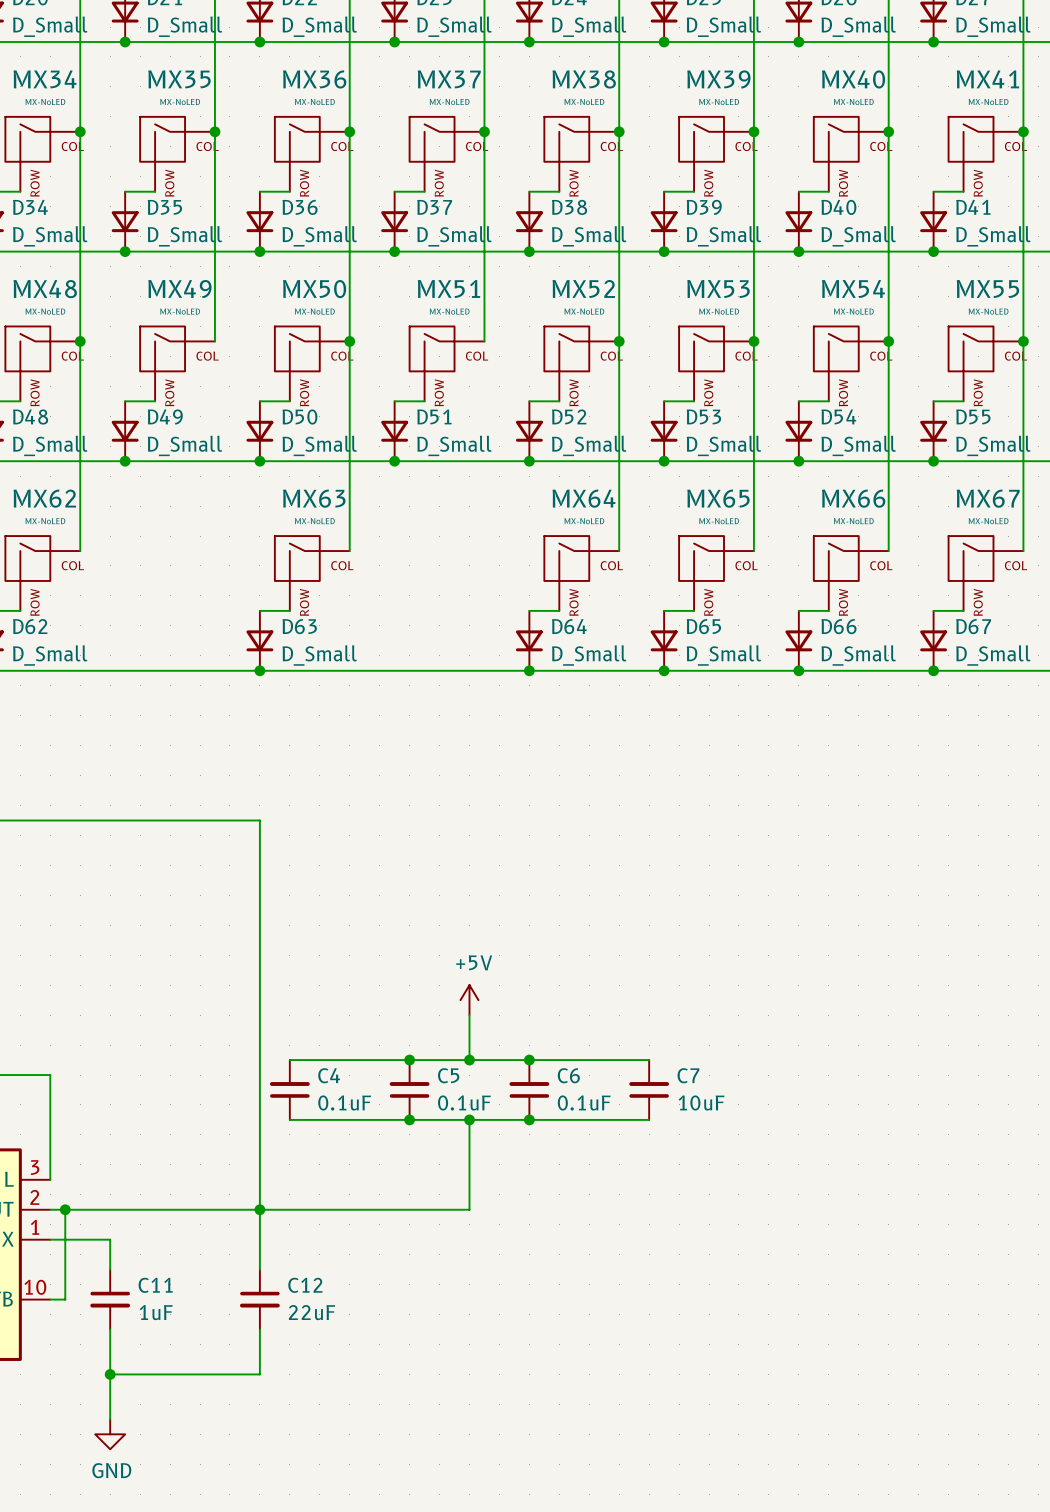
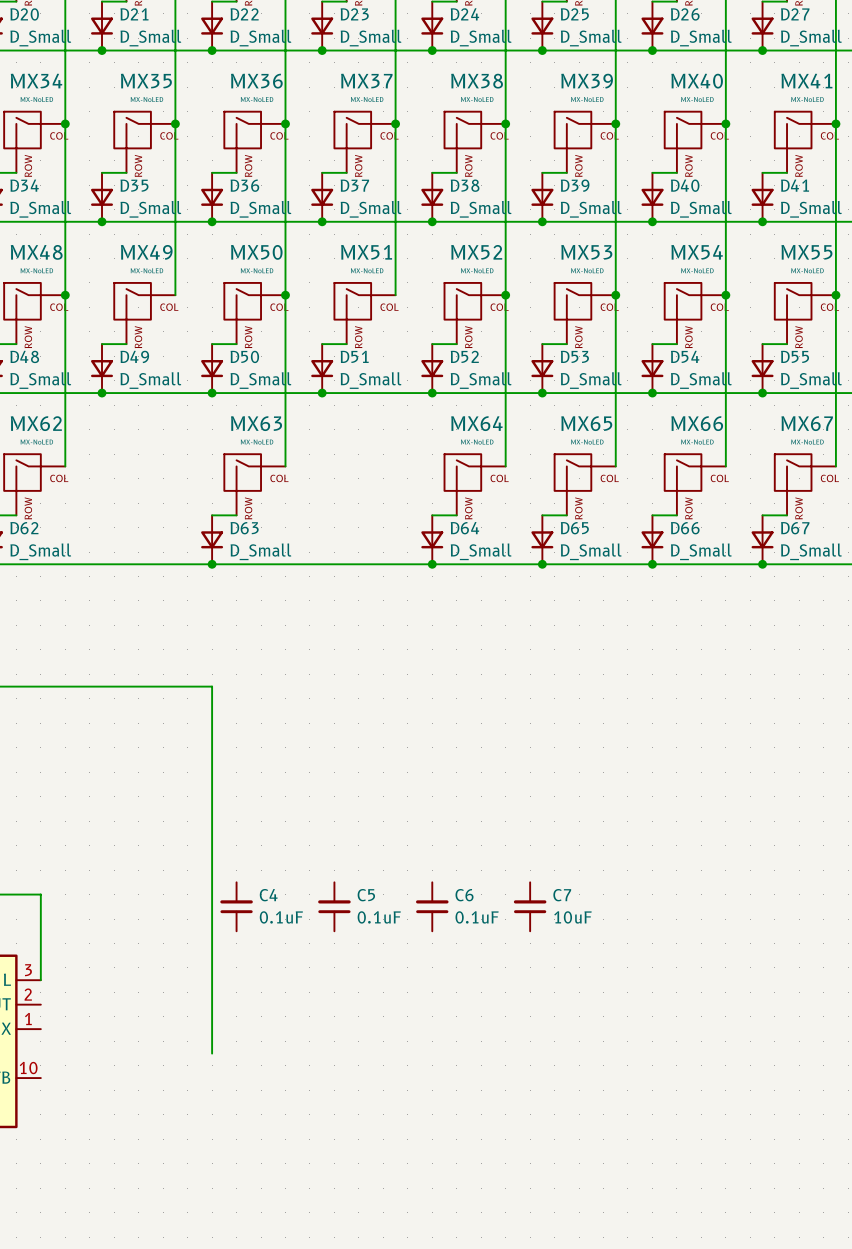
power symbol: +5V (469, 1000) -> none
wire: (469, 1015) (469, 1060) -> none
wire: (289, 1060) (649, 1060) -> none
junction: (409, 1060) -> none
junction: (469, 1060) -> none
junction: (529, 1060) -> none
wire: (289, 1119) (649, 1119) -> none
junction: (409, 1119) -> none
wire: (469, 1119) (469, 1209) (50, 1209) -> none
junction: (469, 1119) -> none
junction: (529, 1119) -> none
wire: (65, 1209) (65, 1299) (50, 1299) -> none
junction: (65, 1209) -> none
junction: (259, 1209) -> none
wire: (50, 1239) (110, 1239) (110, 1269) -> none
C11: 1uF (110, 1299) -> none
C12: 22uF (259, 1299) -> none
wire: (110, 1329) (110, 1419) -> none
wire: (259, 1329) (259, 1374) (110, 1374) -> none
junction: (110, 1374) -> none
power symbol: GND (110, 1434) -> none

